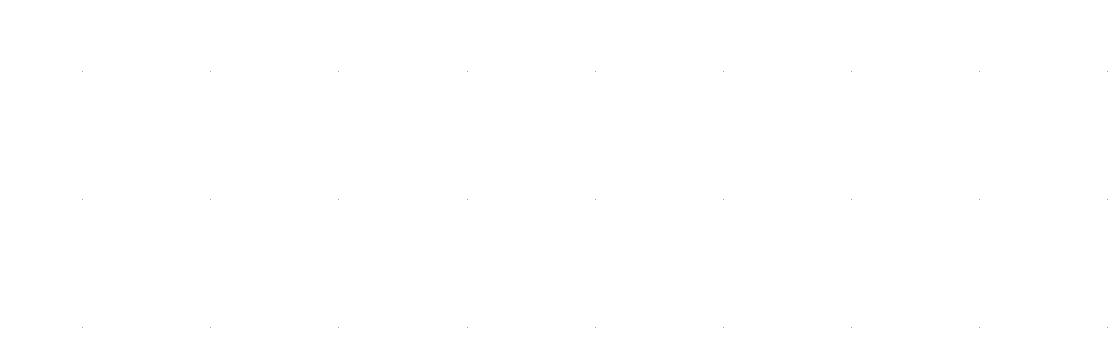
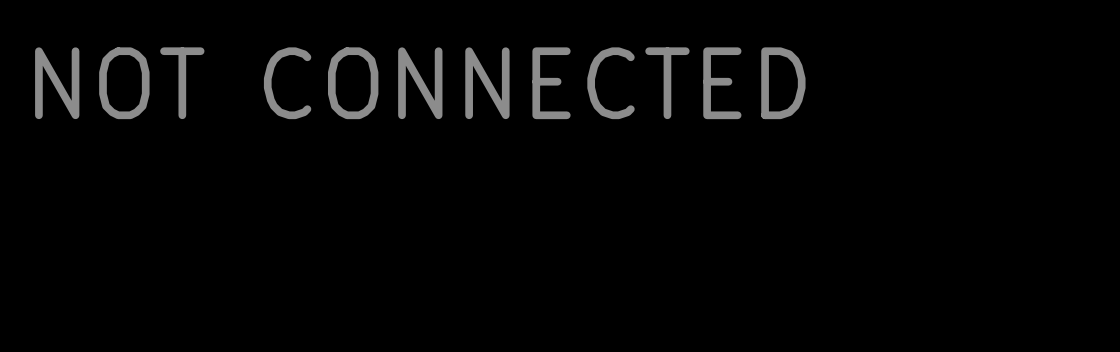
text: none -> NOT CONNECTED (420, 83)

